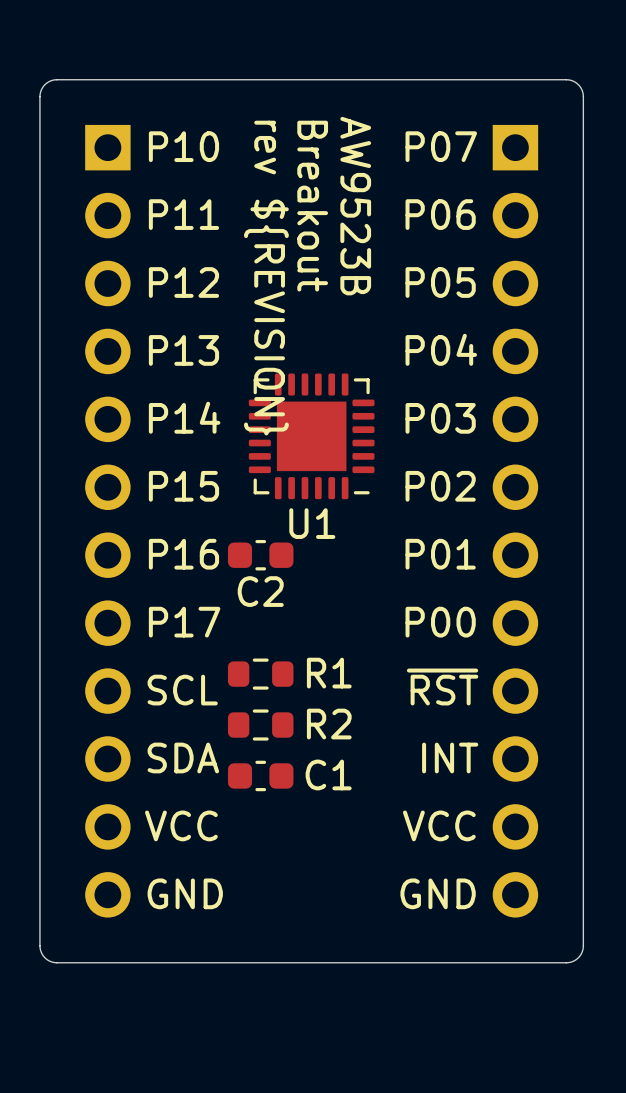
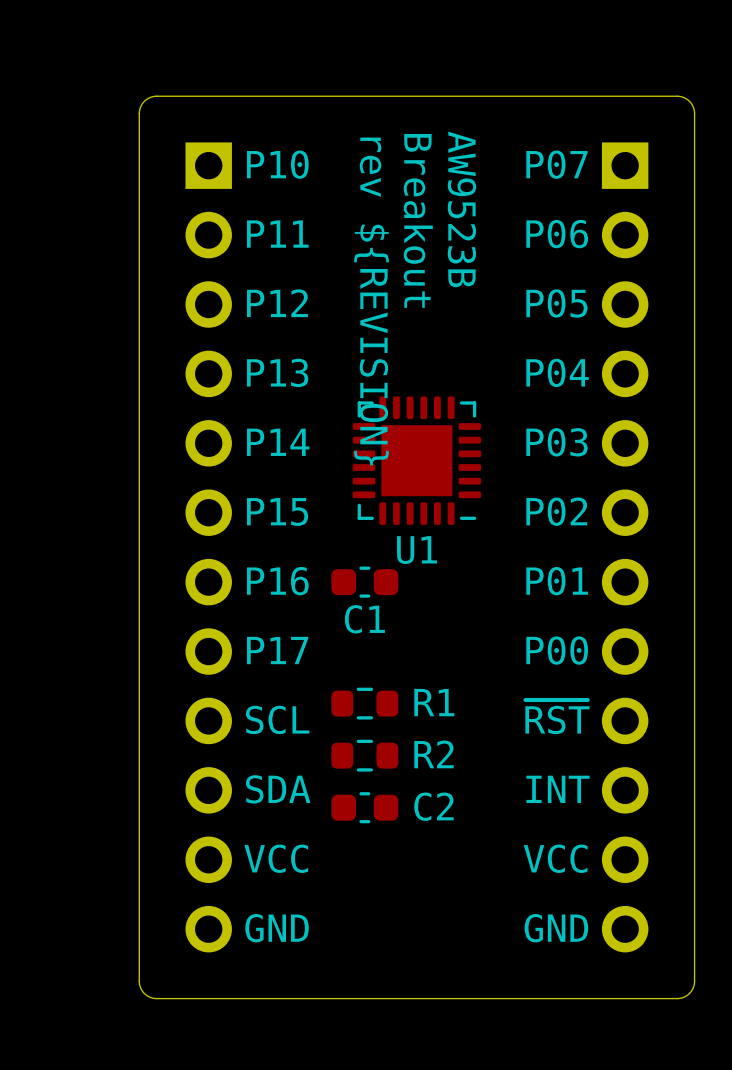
C2 name: C2 (260, 591) -> C1 (364, 619)
C1 name: C1 (328, 774) -> C2 (433, 806)

